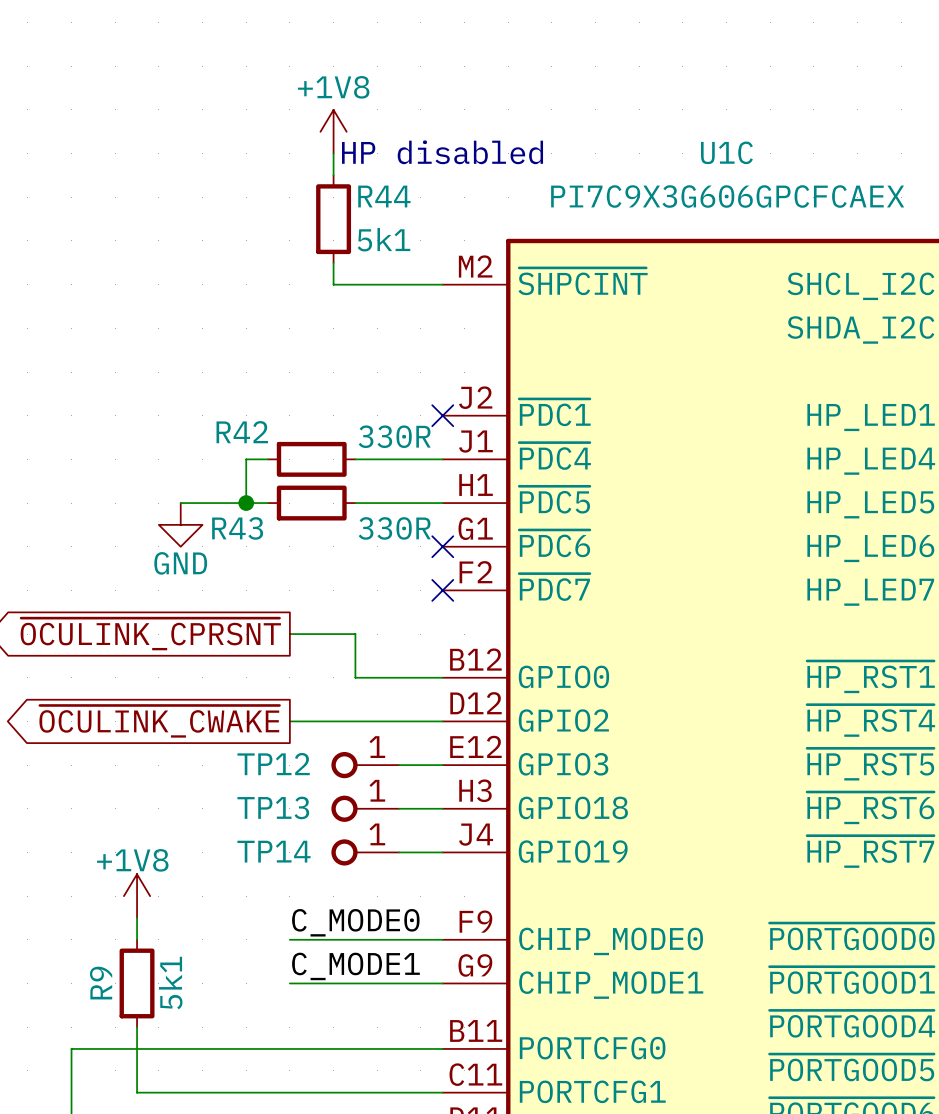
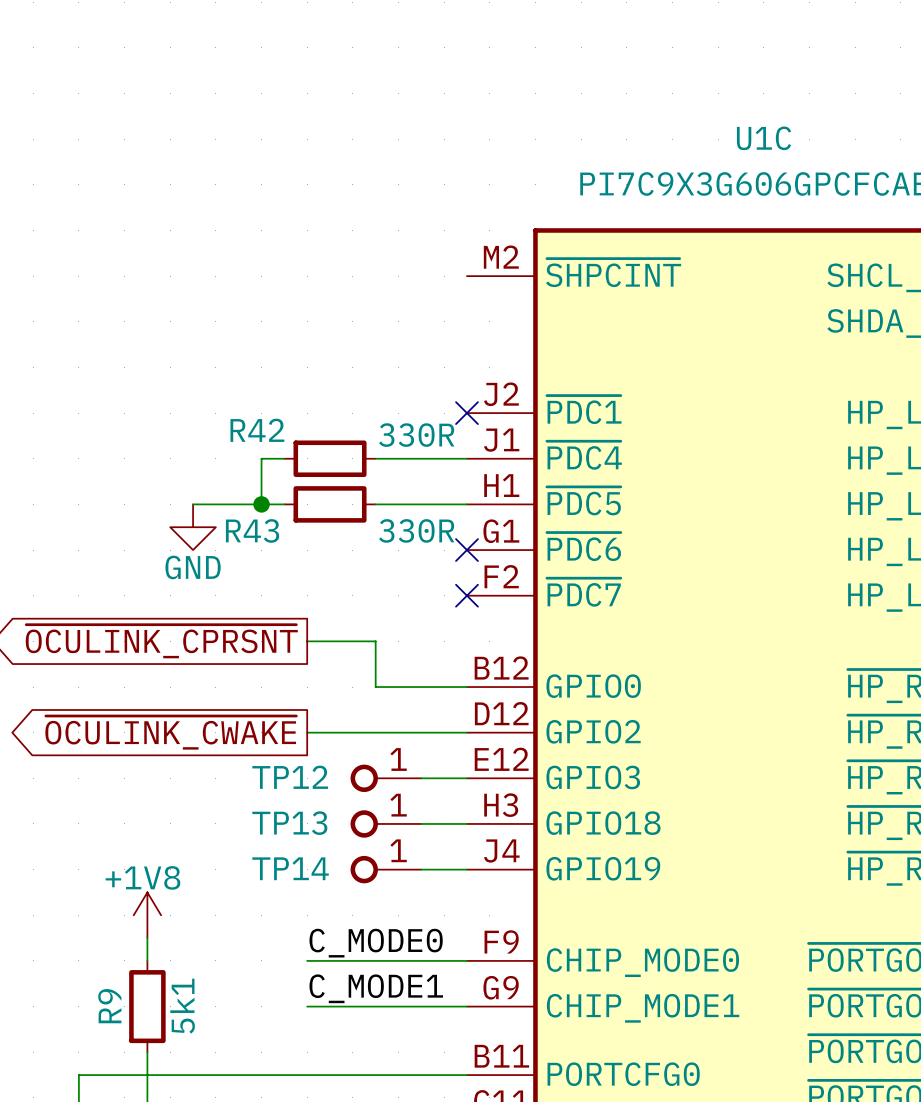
power symbol: +1V8 (333, 131) -> none
text: HP disabled (442, 152) -> none
wire: (333, 153) (333, 175) -> none
R44: (333, 219) -> none
wire: (333, 262) (333, 284) (442, 284) -> none

